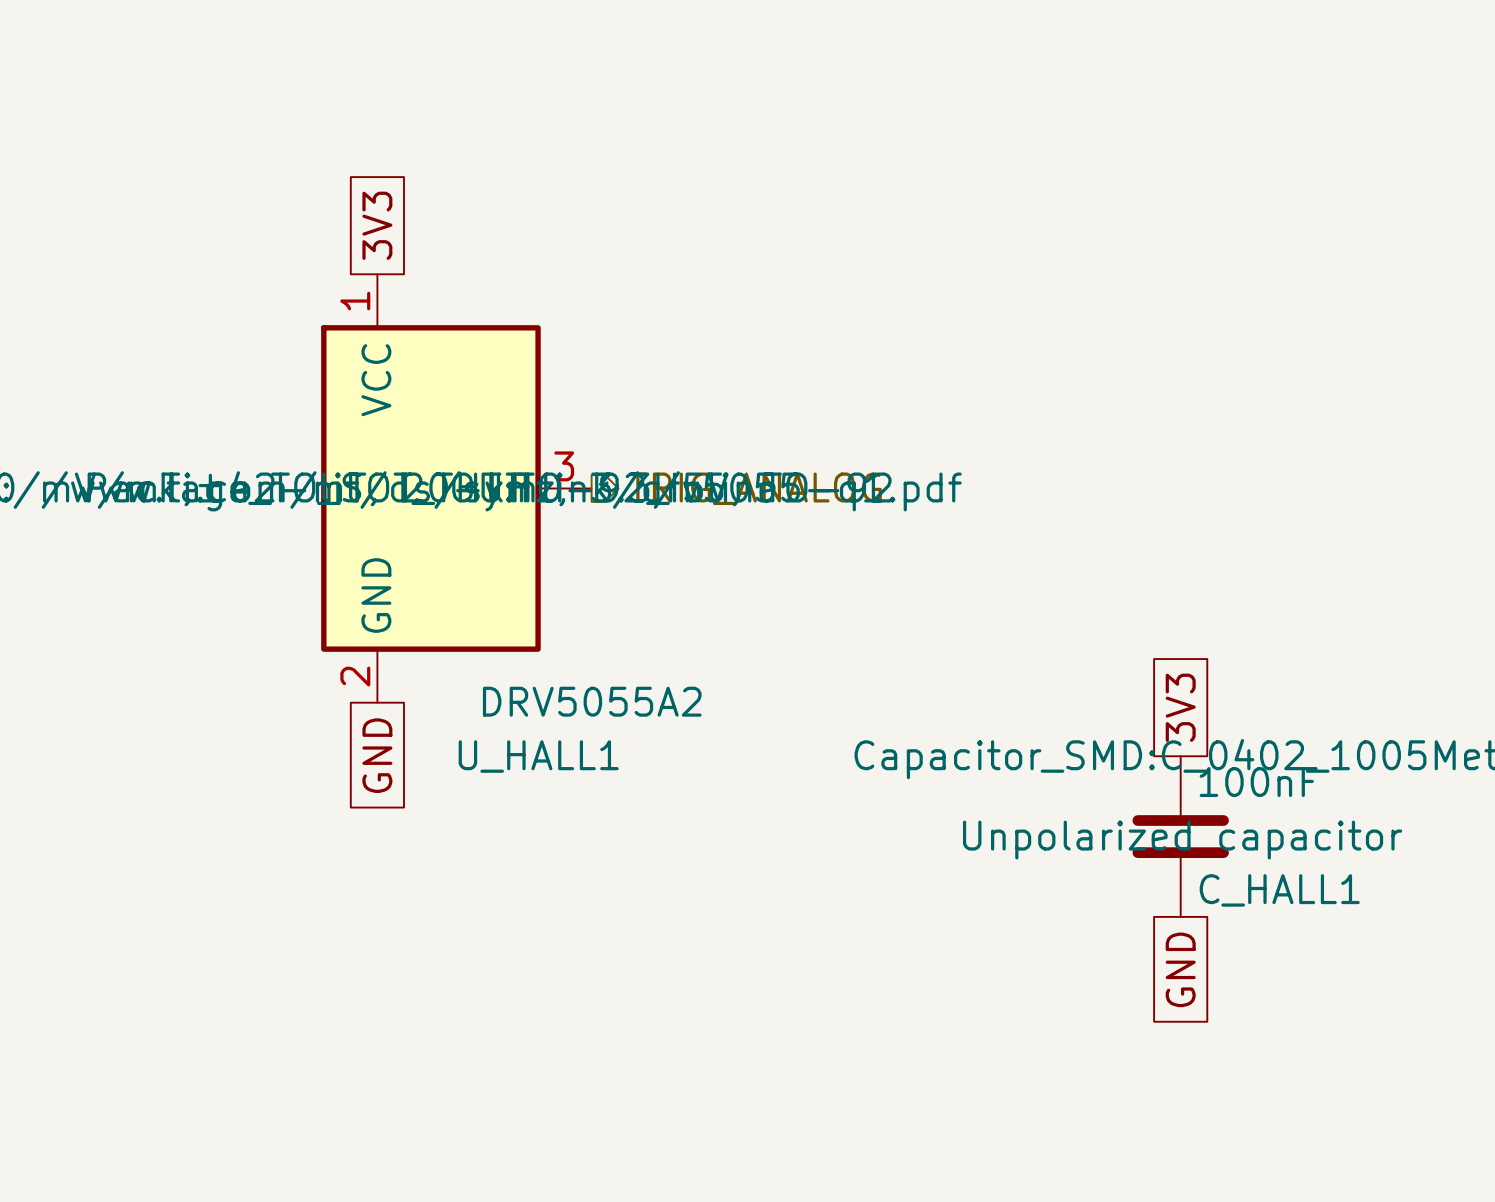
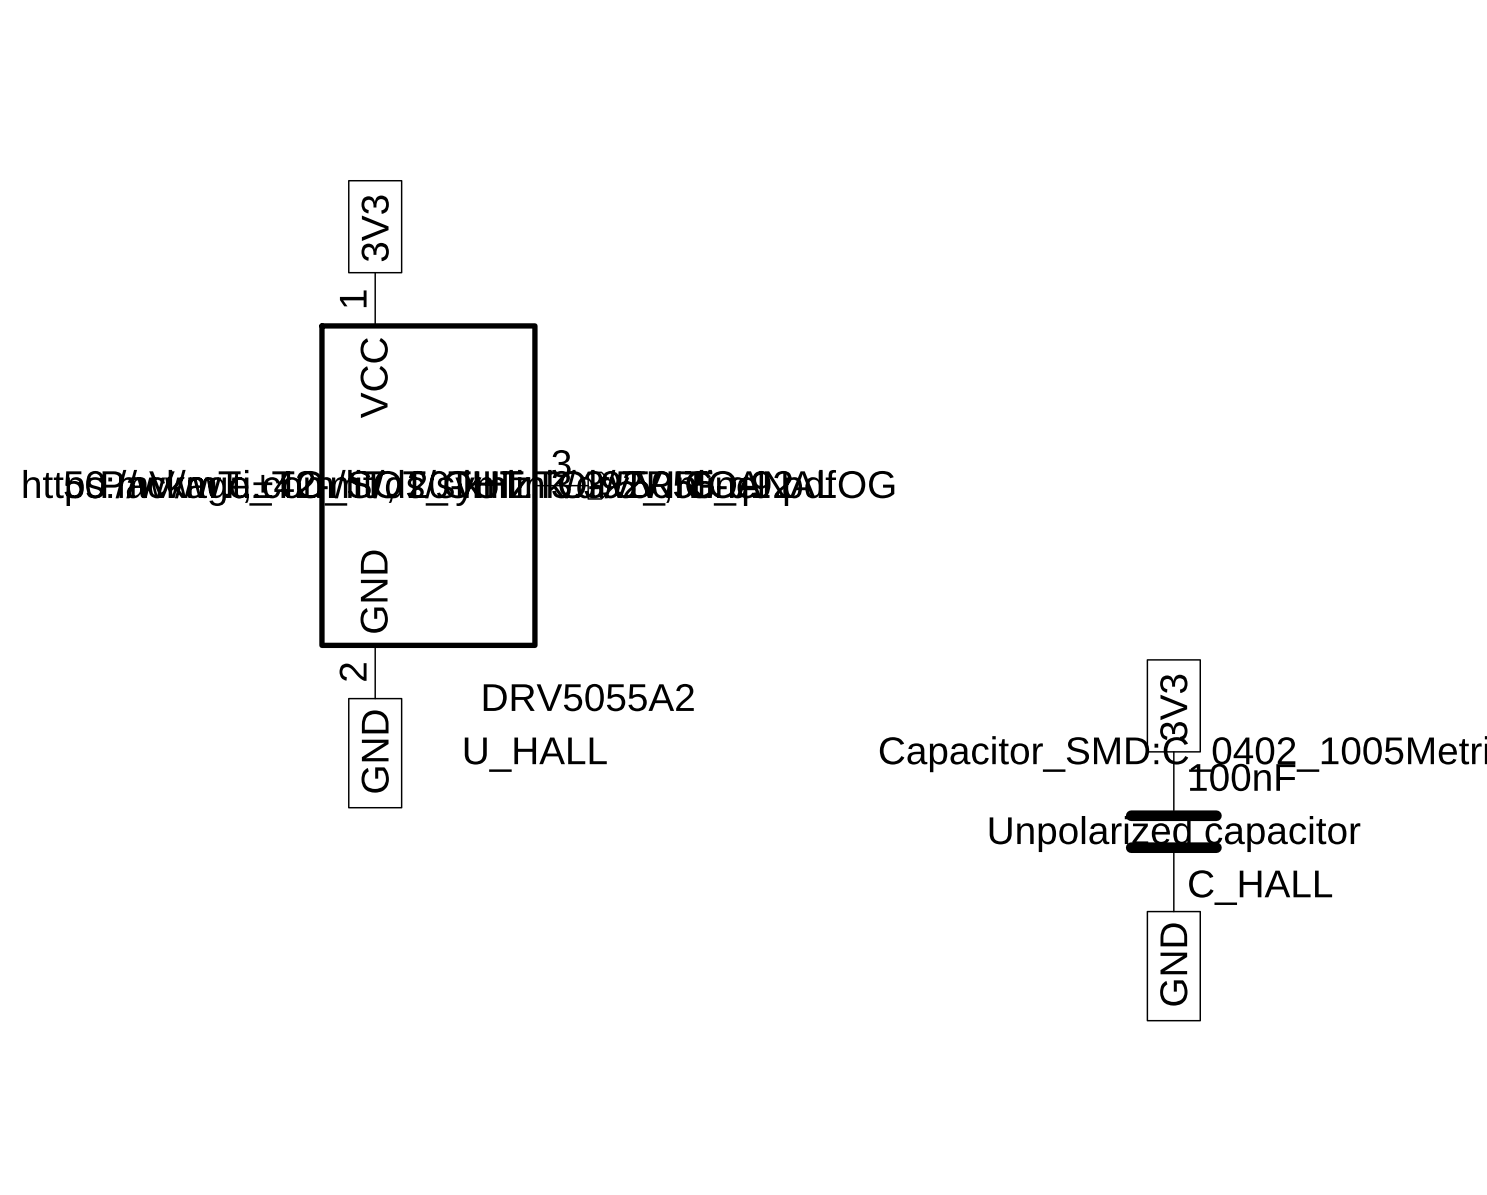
U_HALL1 name: U_HALL1 (538, 756) -> U_HALL (535, 754)
C_HALL1 name: C_HALL1 (1279, 890) -> C_HALL (1260, 887)

